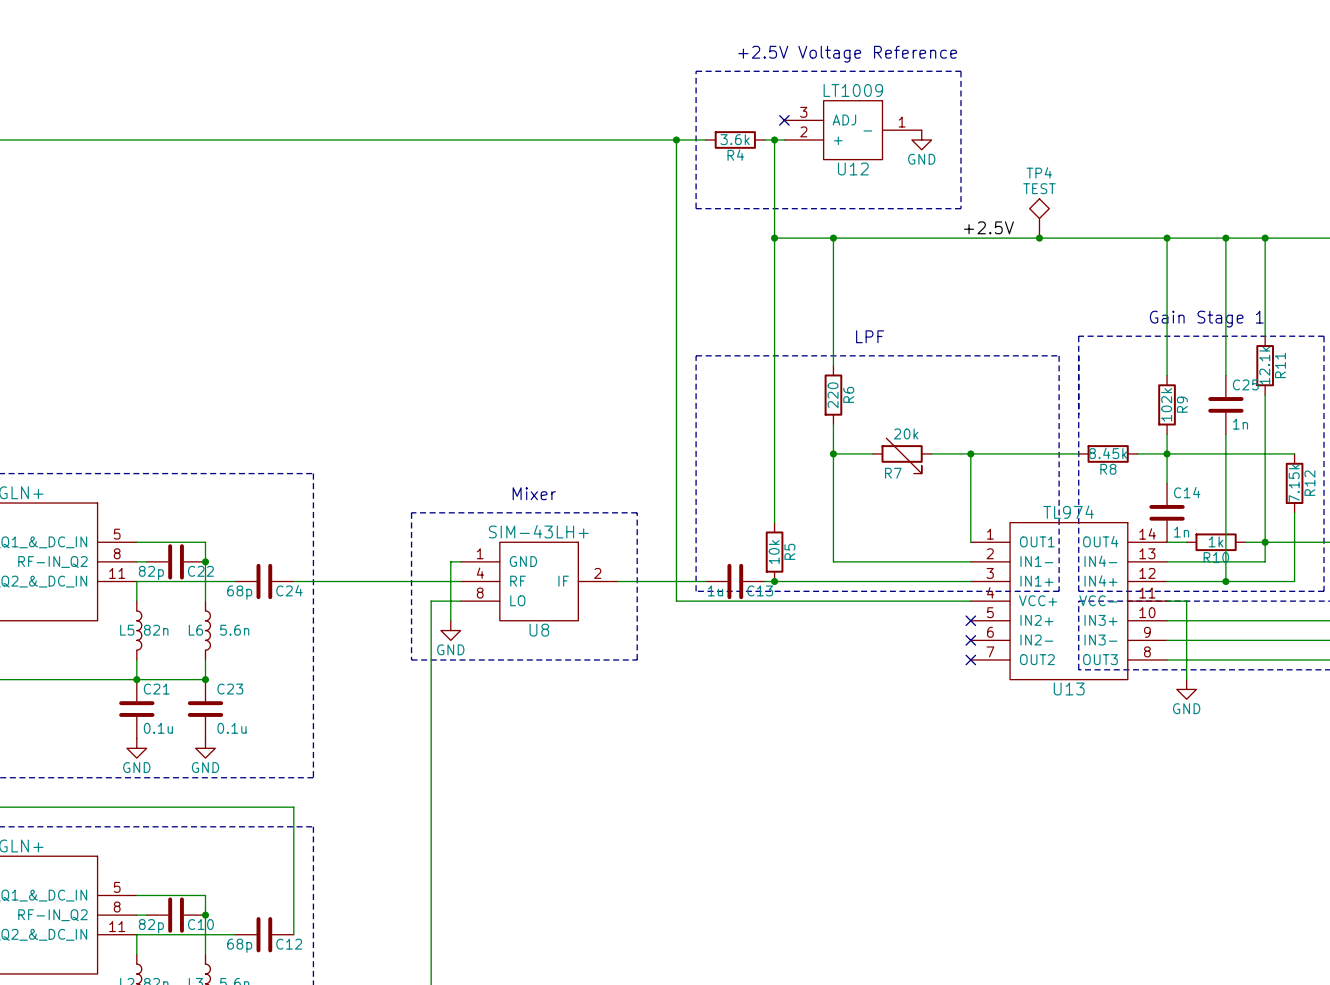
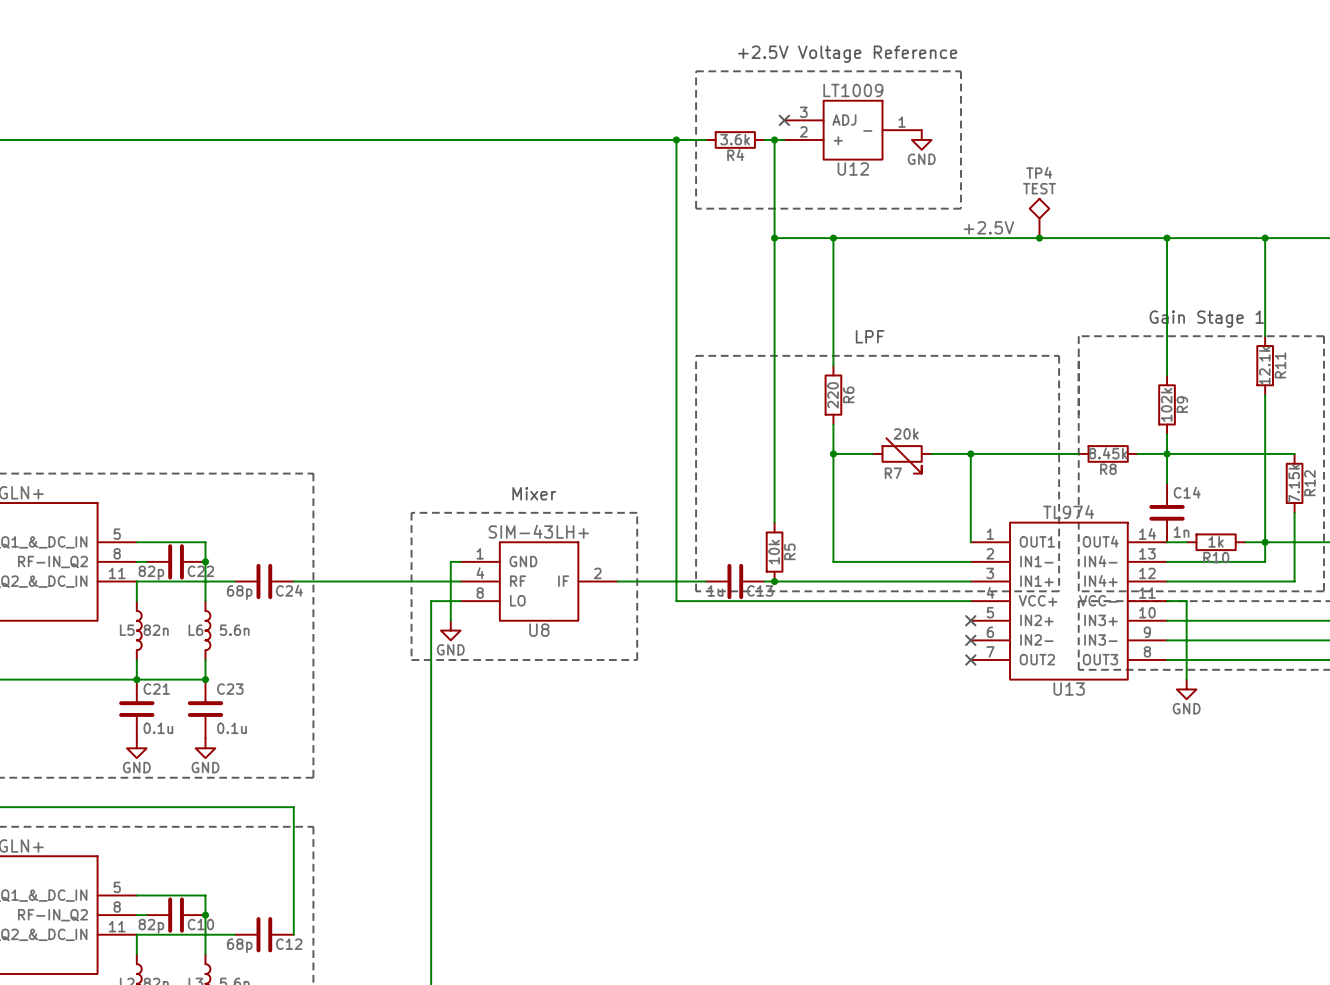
wire: (1225, 238) (1225, 375) -> none
junction: (1225, 238) -> none
C25: 1n (1225, 404) -> none
wire: (1225, 434) (1225, 581) -> none
junction: (1225, 581) -> none

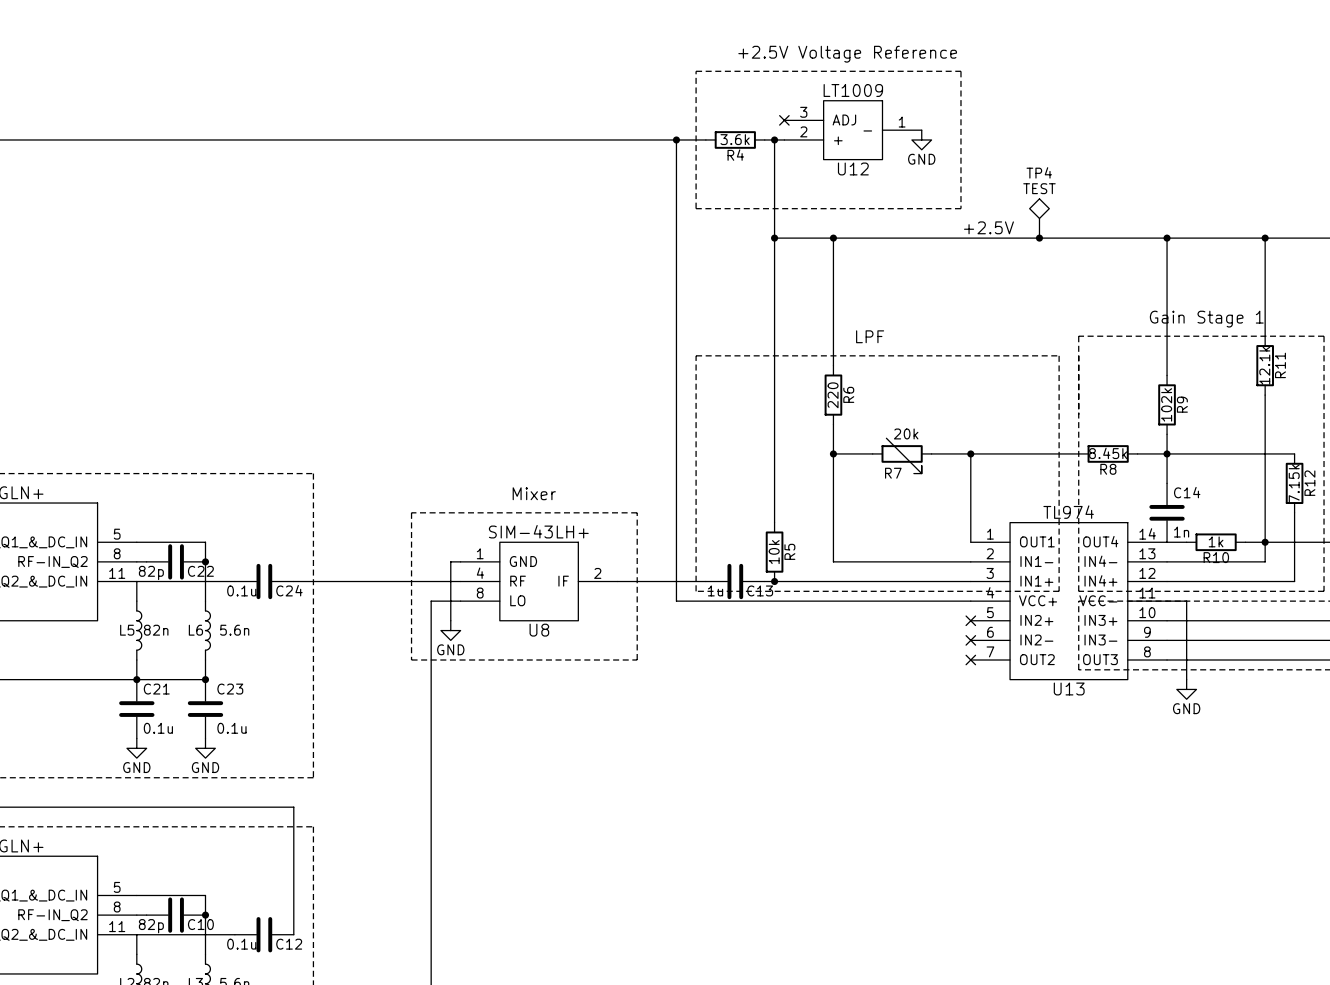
C24 value: 68p (239, 592) -> 0.1u (241, 590)
C12 value: 68p (239, 945) -> 0.1u (241, 944)

